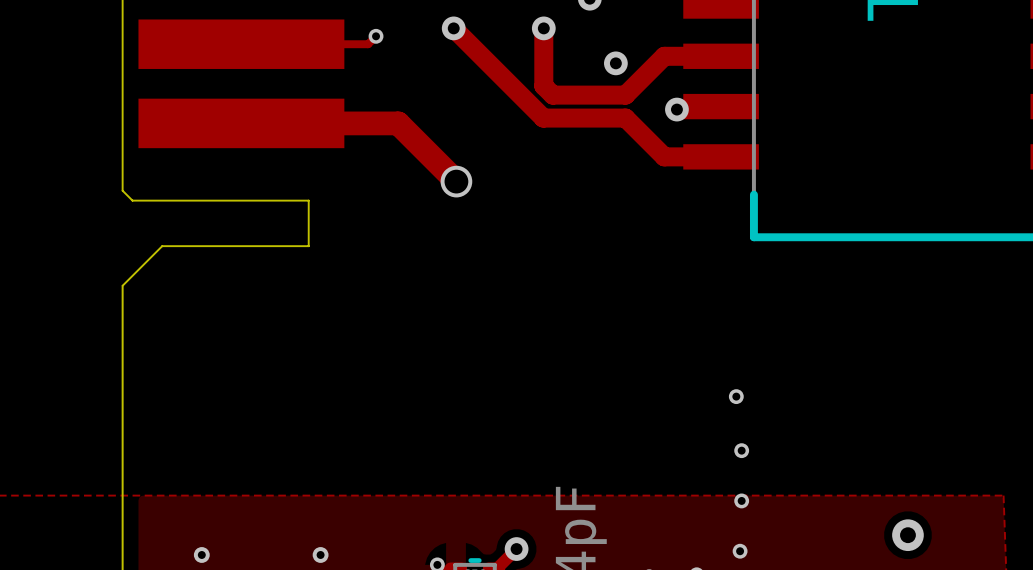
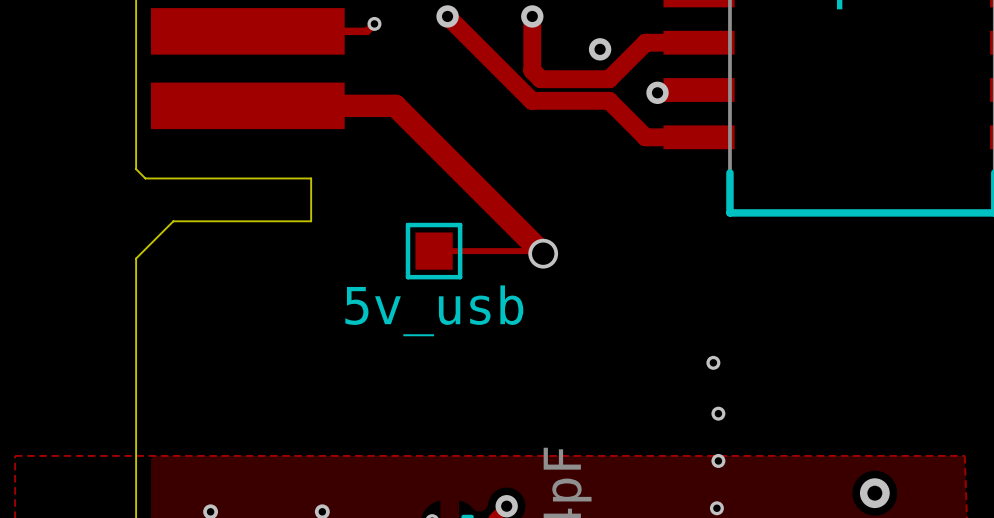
track: none -> (450, 160) (543, 253) (540, 251) (434, 251)
via position: (456, 181) -> (543, 253)
5v_usb: none -> (434, 251)

